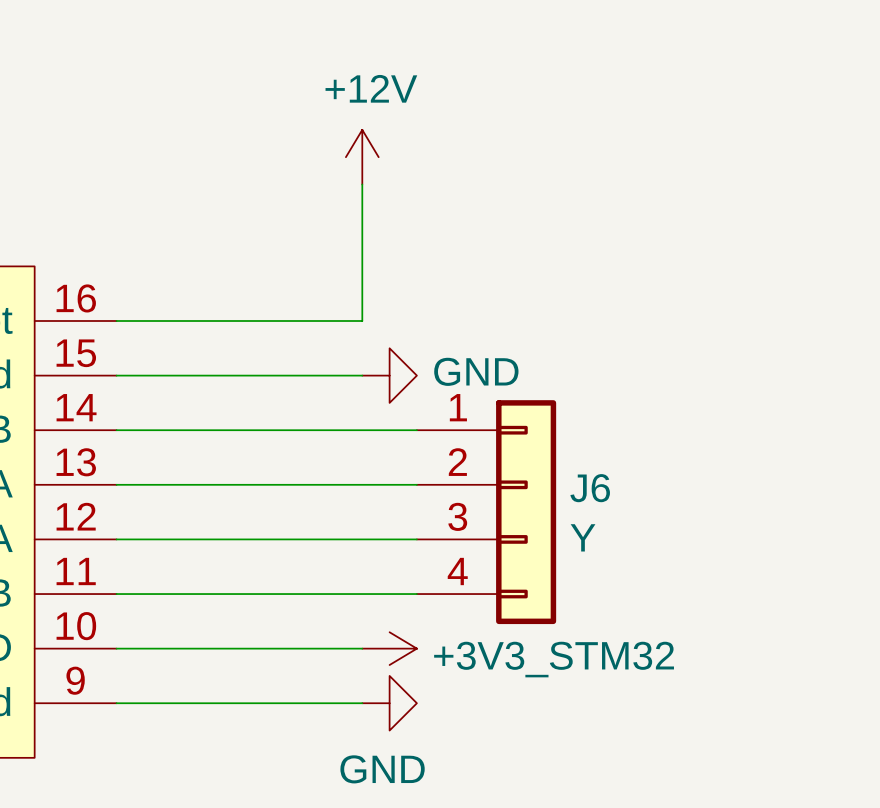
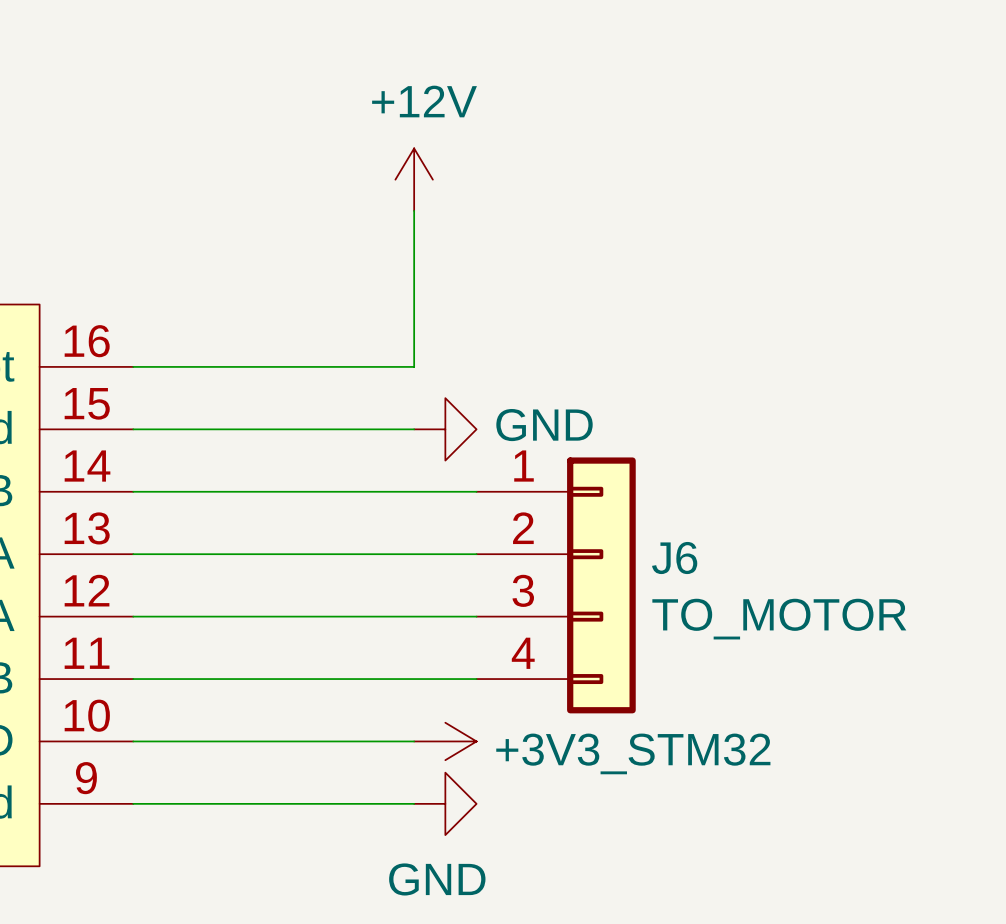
J6 value: Y (583, 537) -> TO_MOTOR (779, 619)

